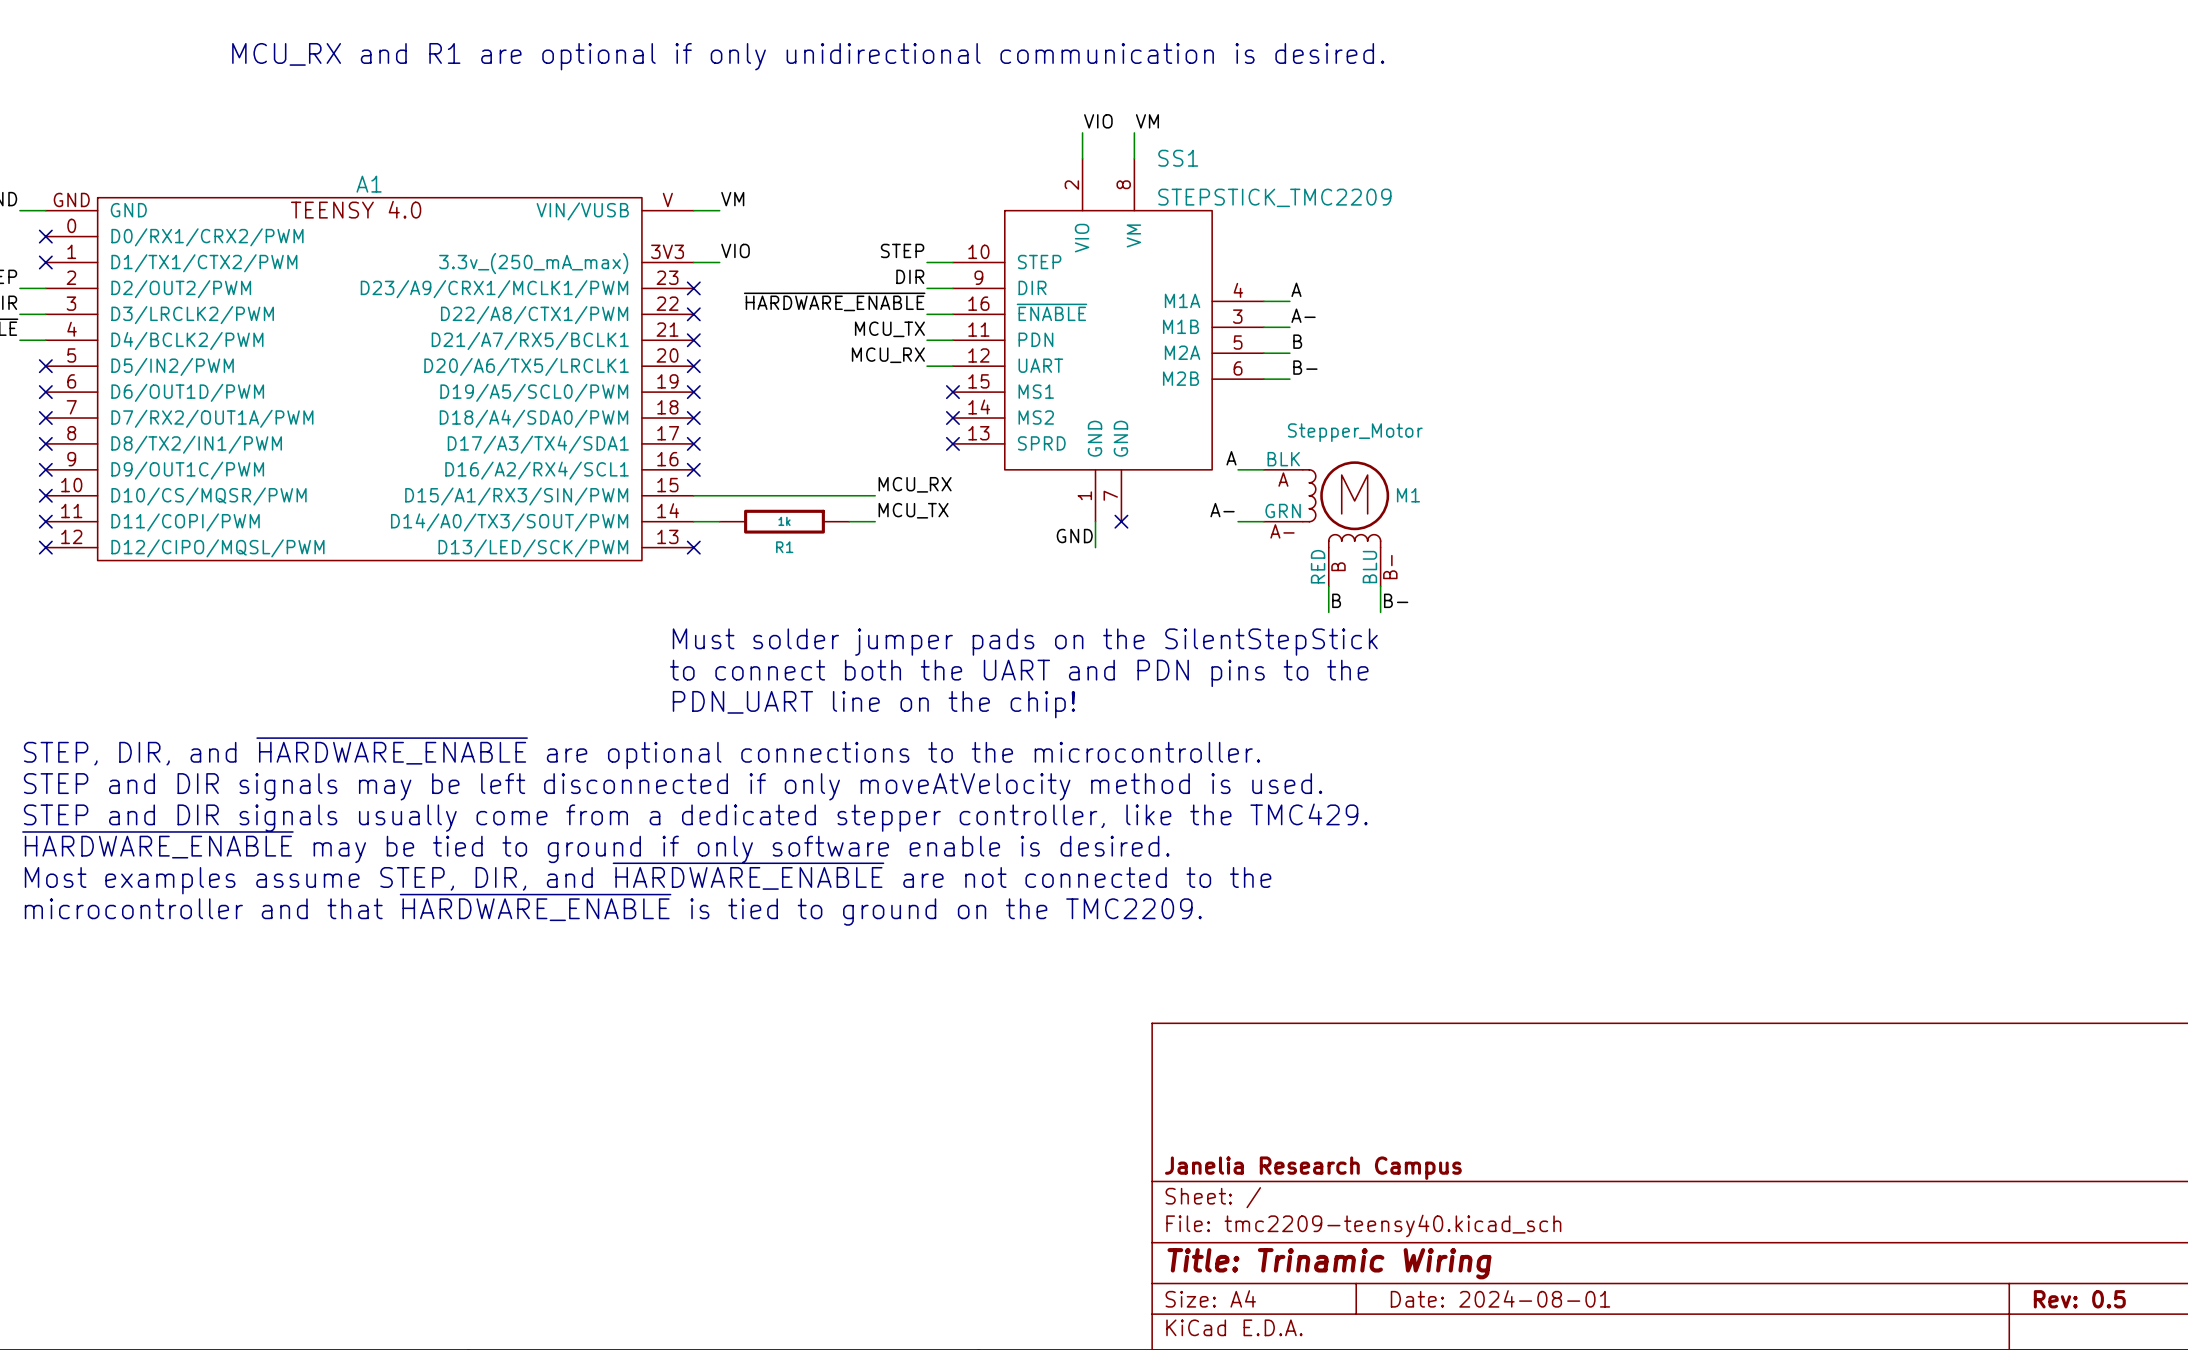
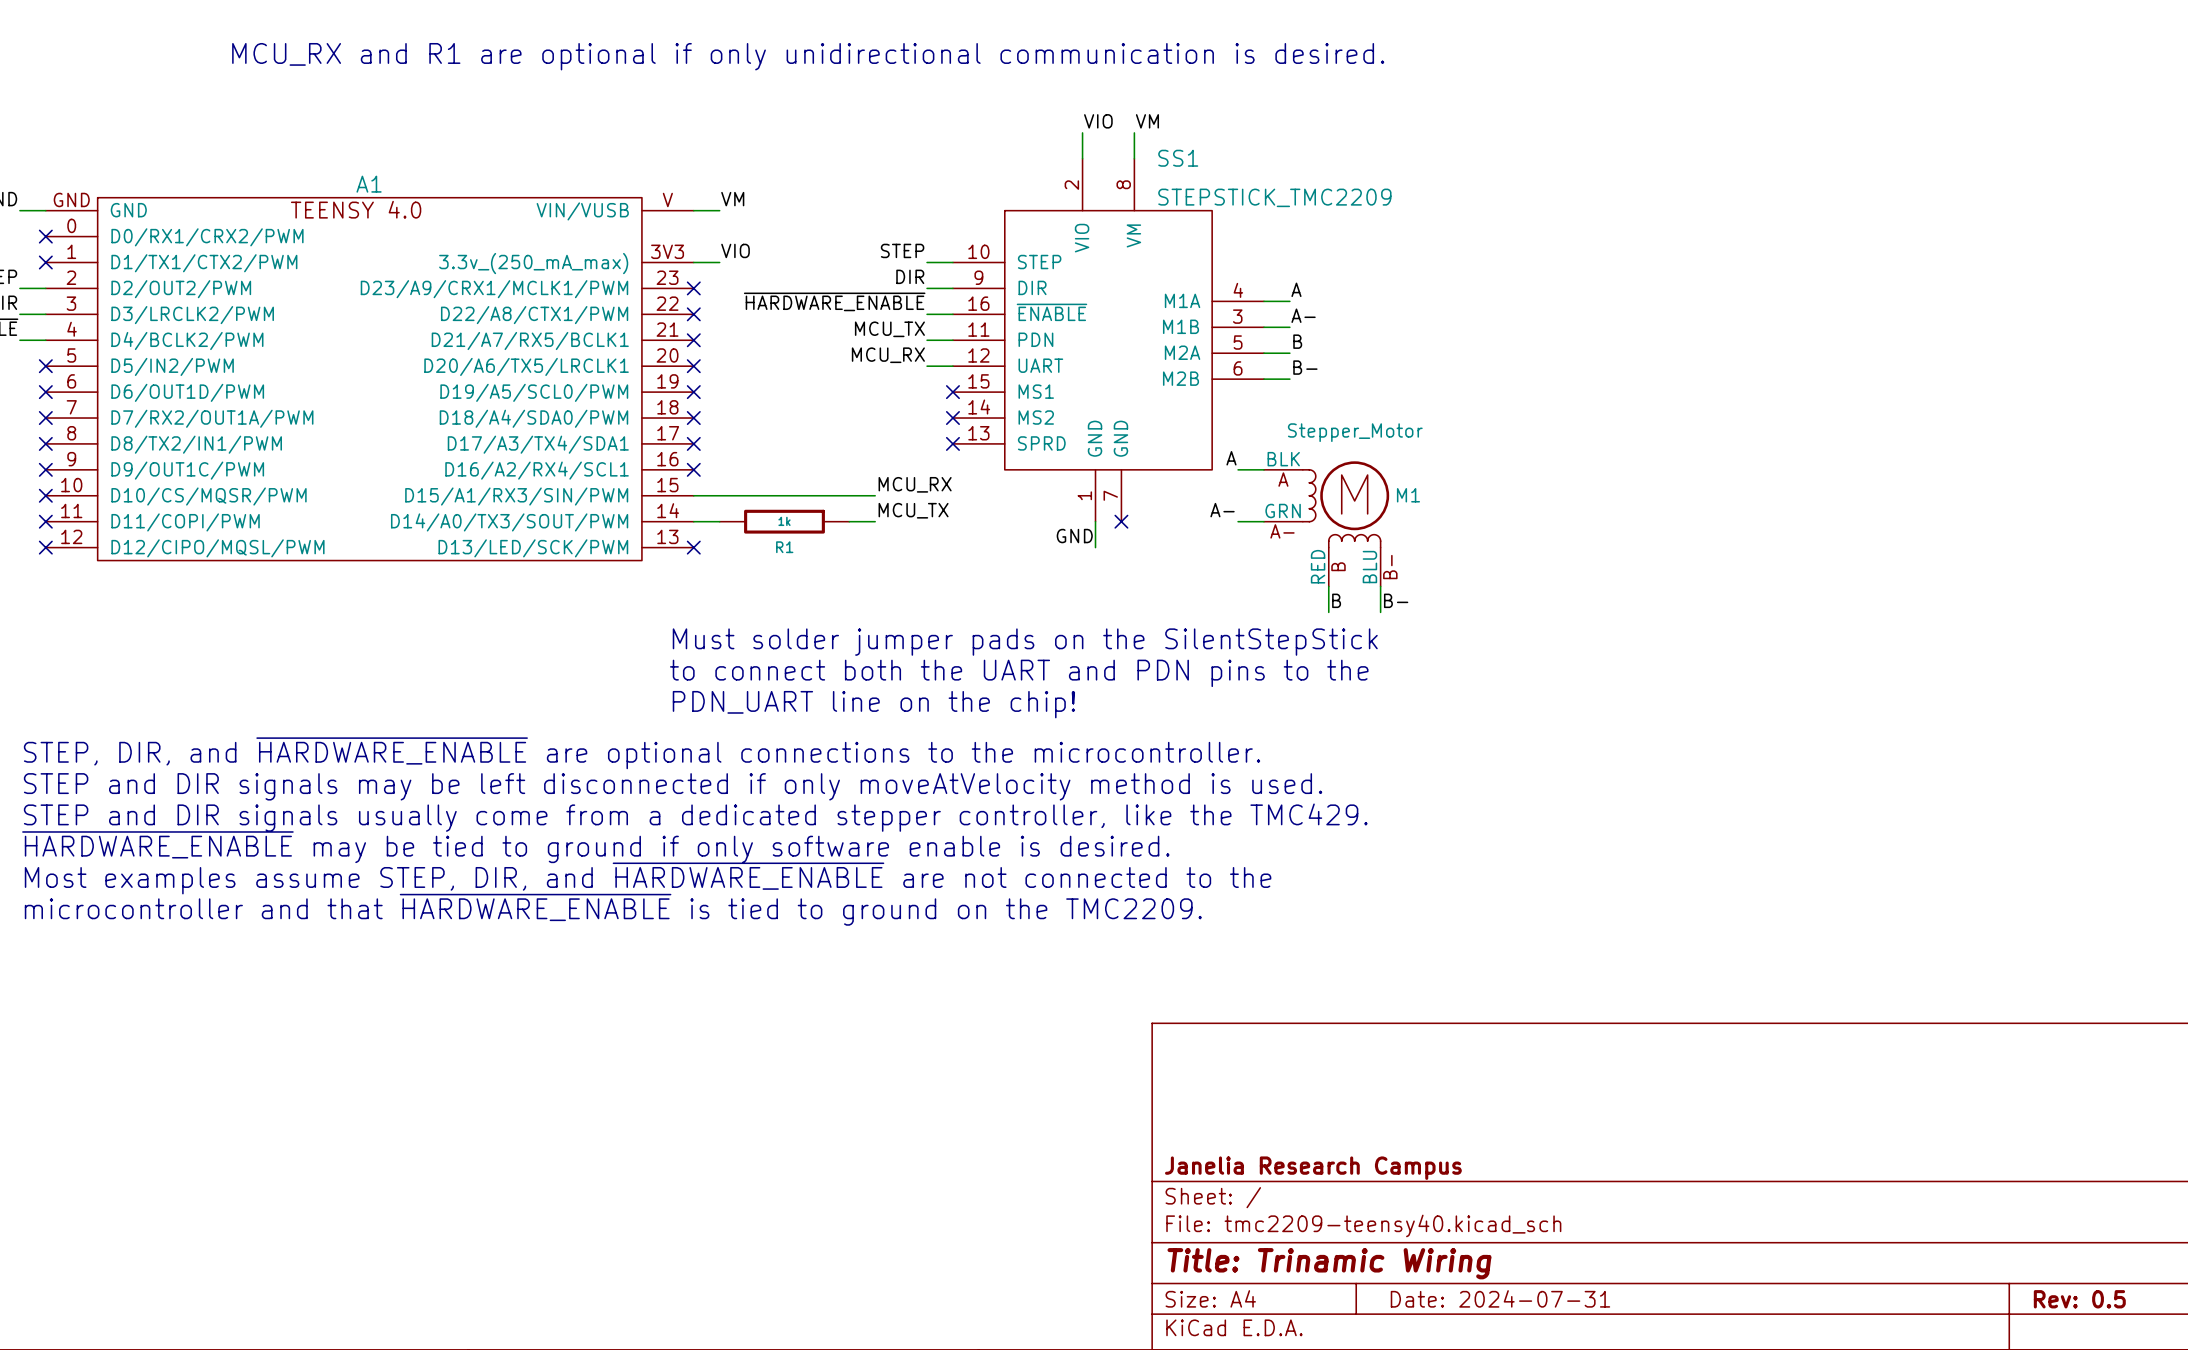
title block: Date: 2024-08-01 (1500, 1298) -> Date: 2024-07-31 (1500, 1298)

